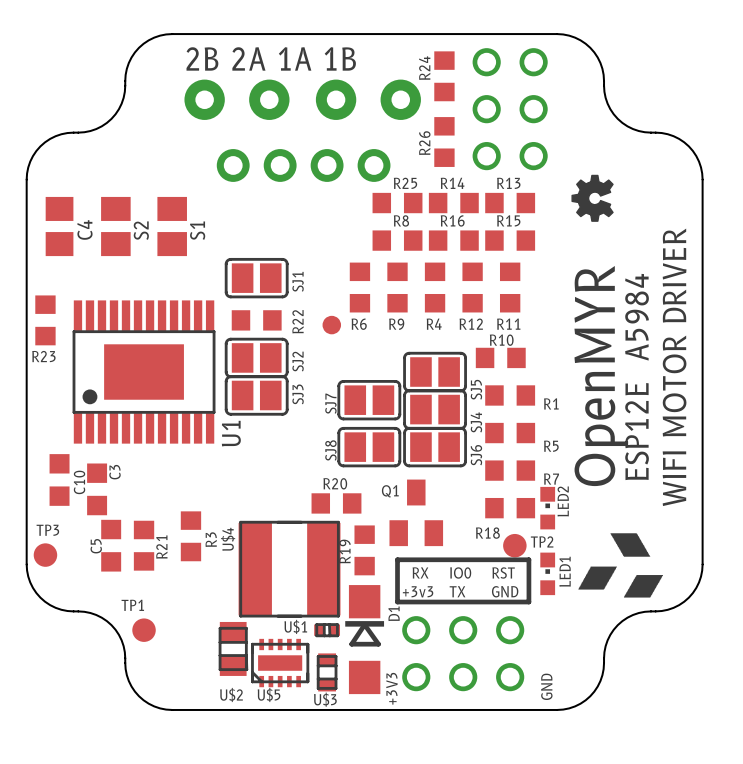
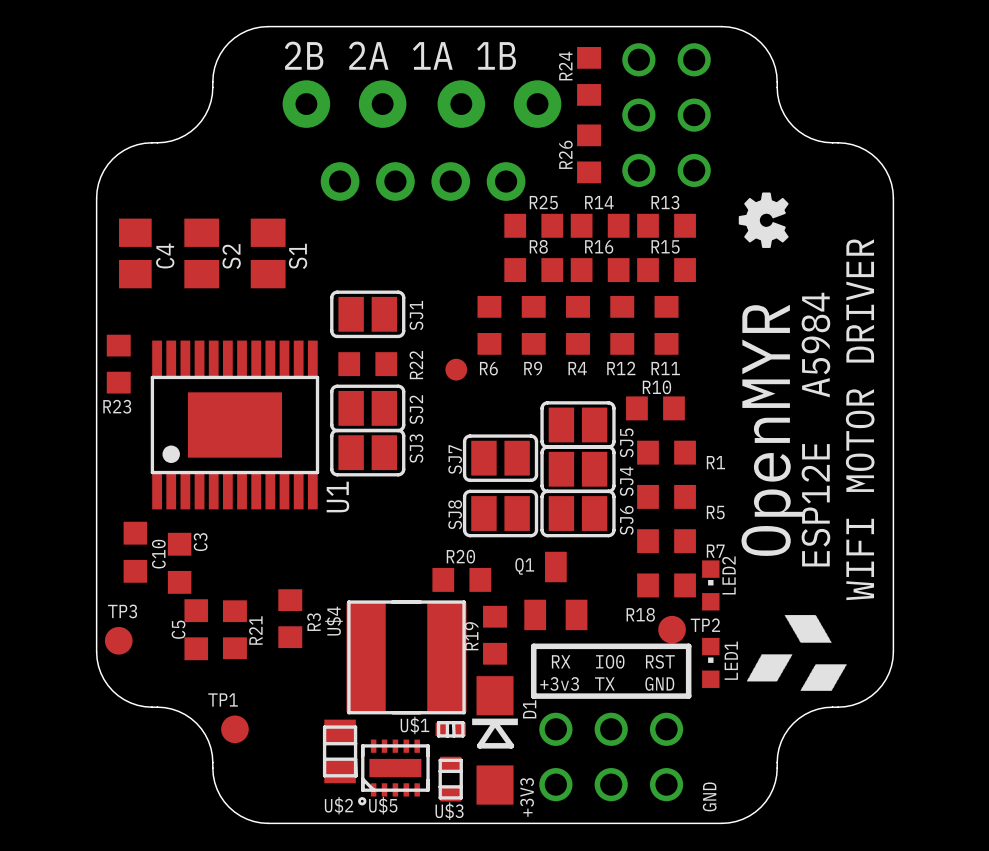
U$5 footprint: [251, 638, 310, 688] -> [358, 739, 430, 806]

